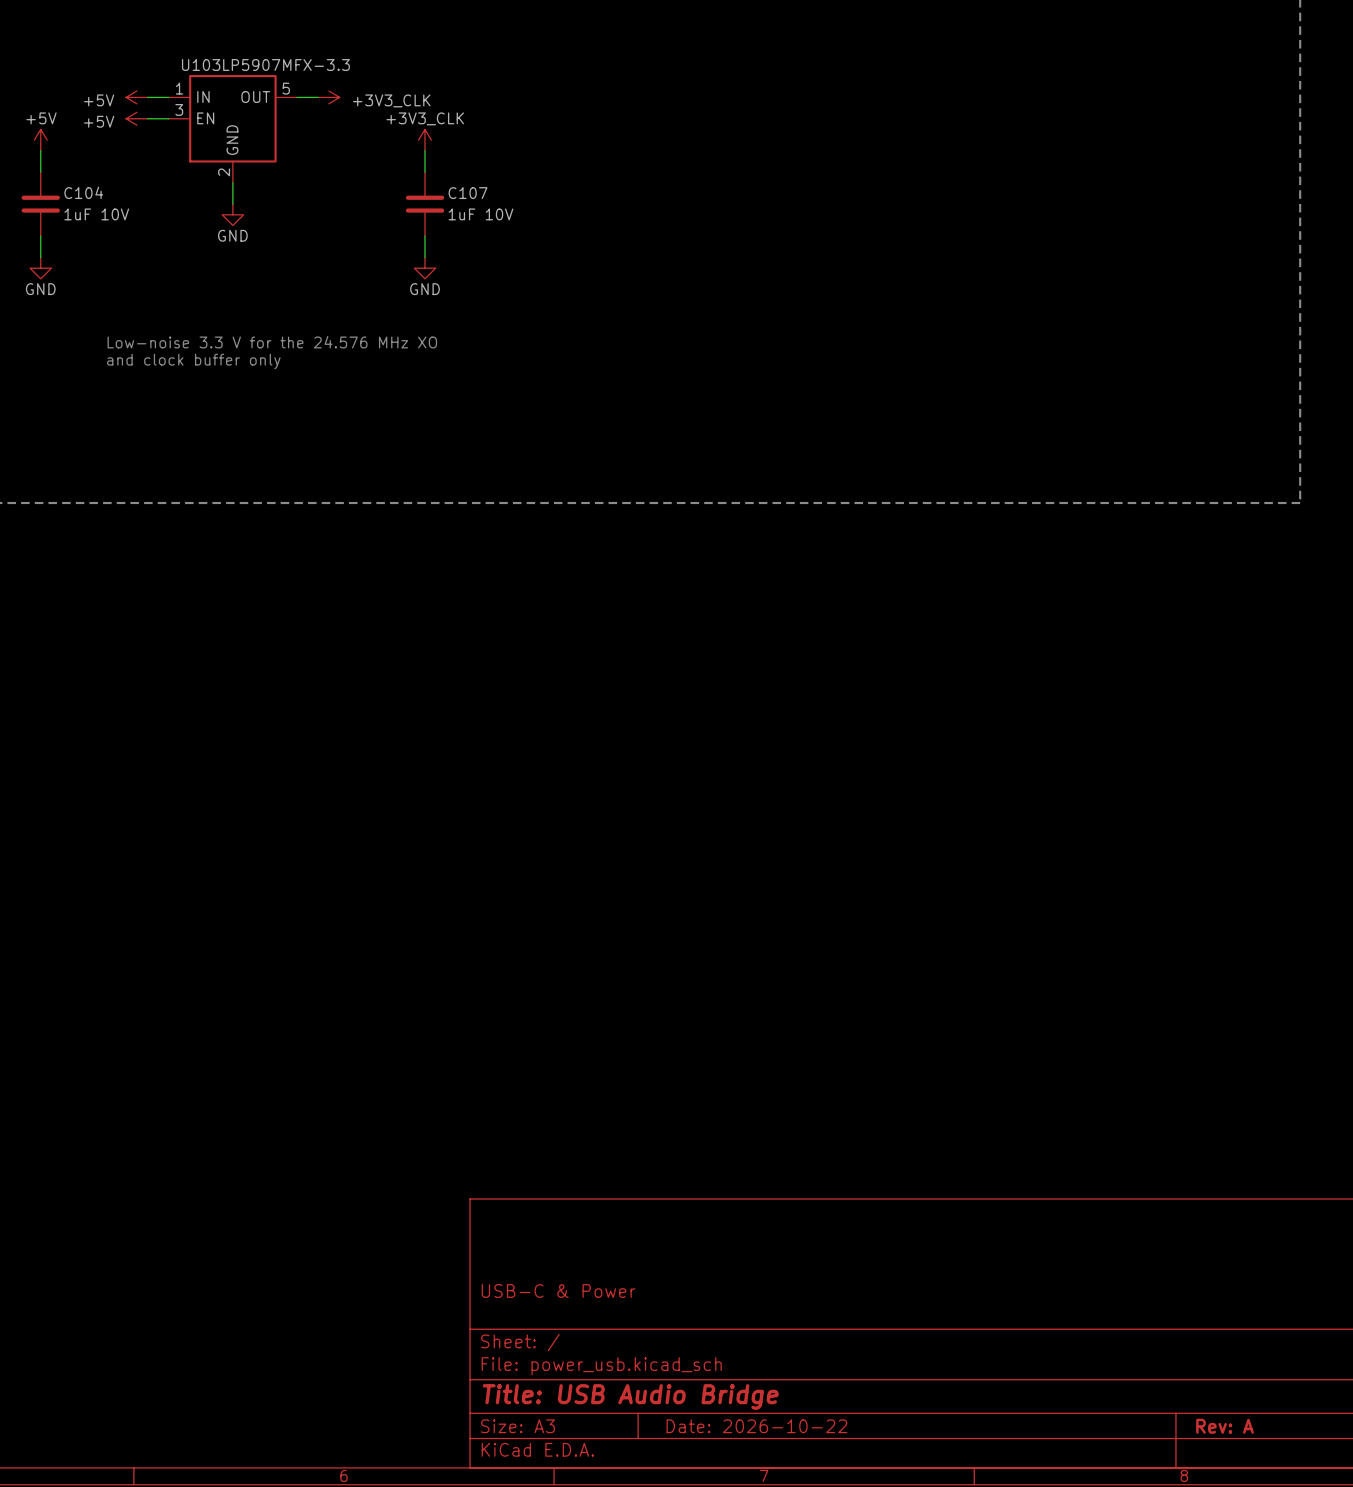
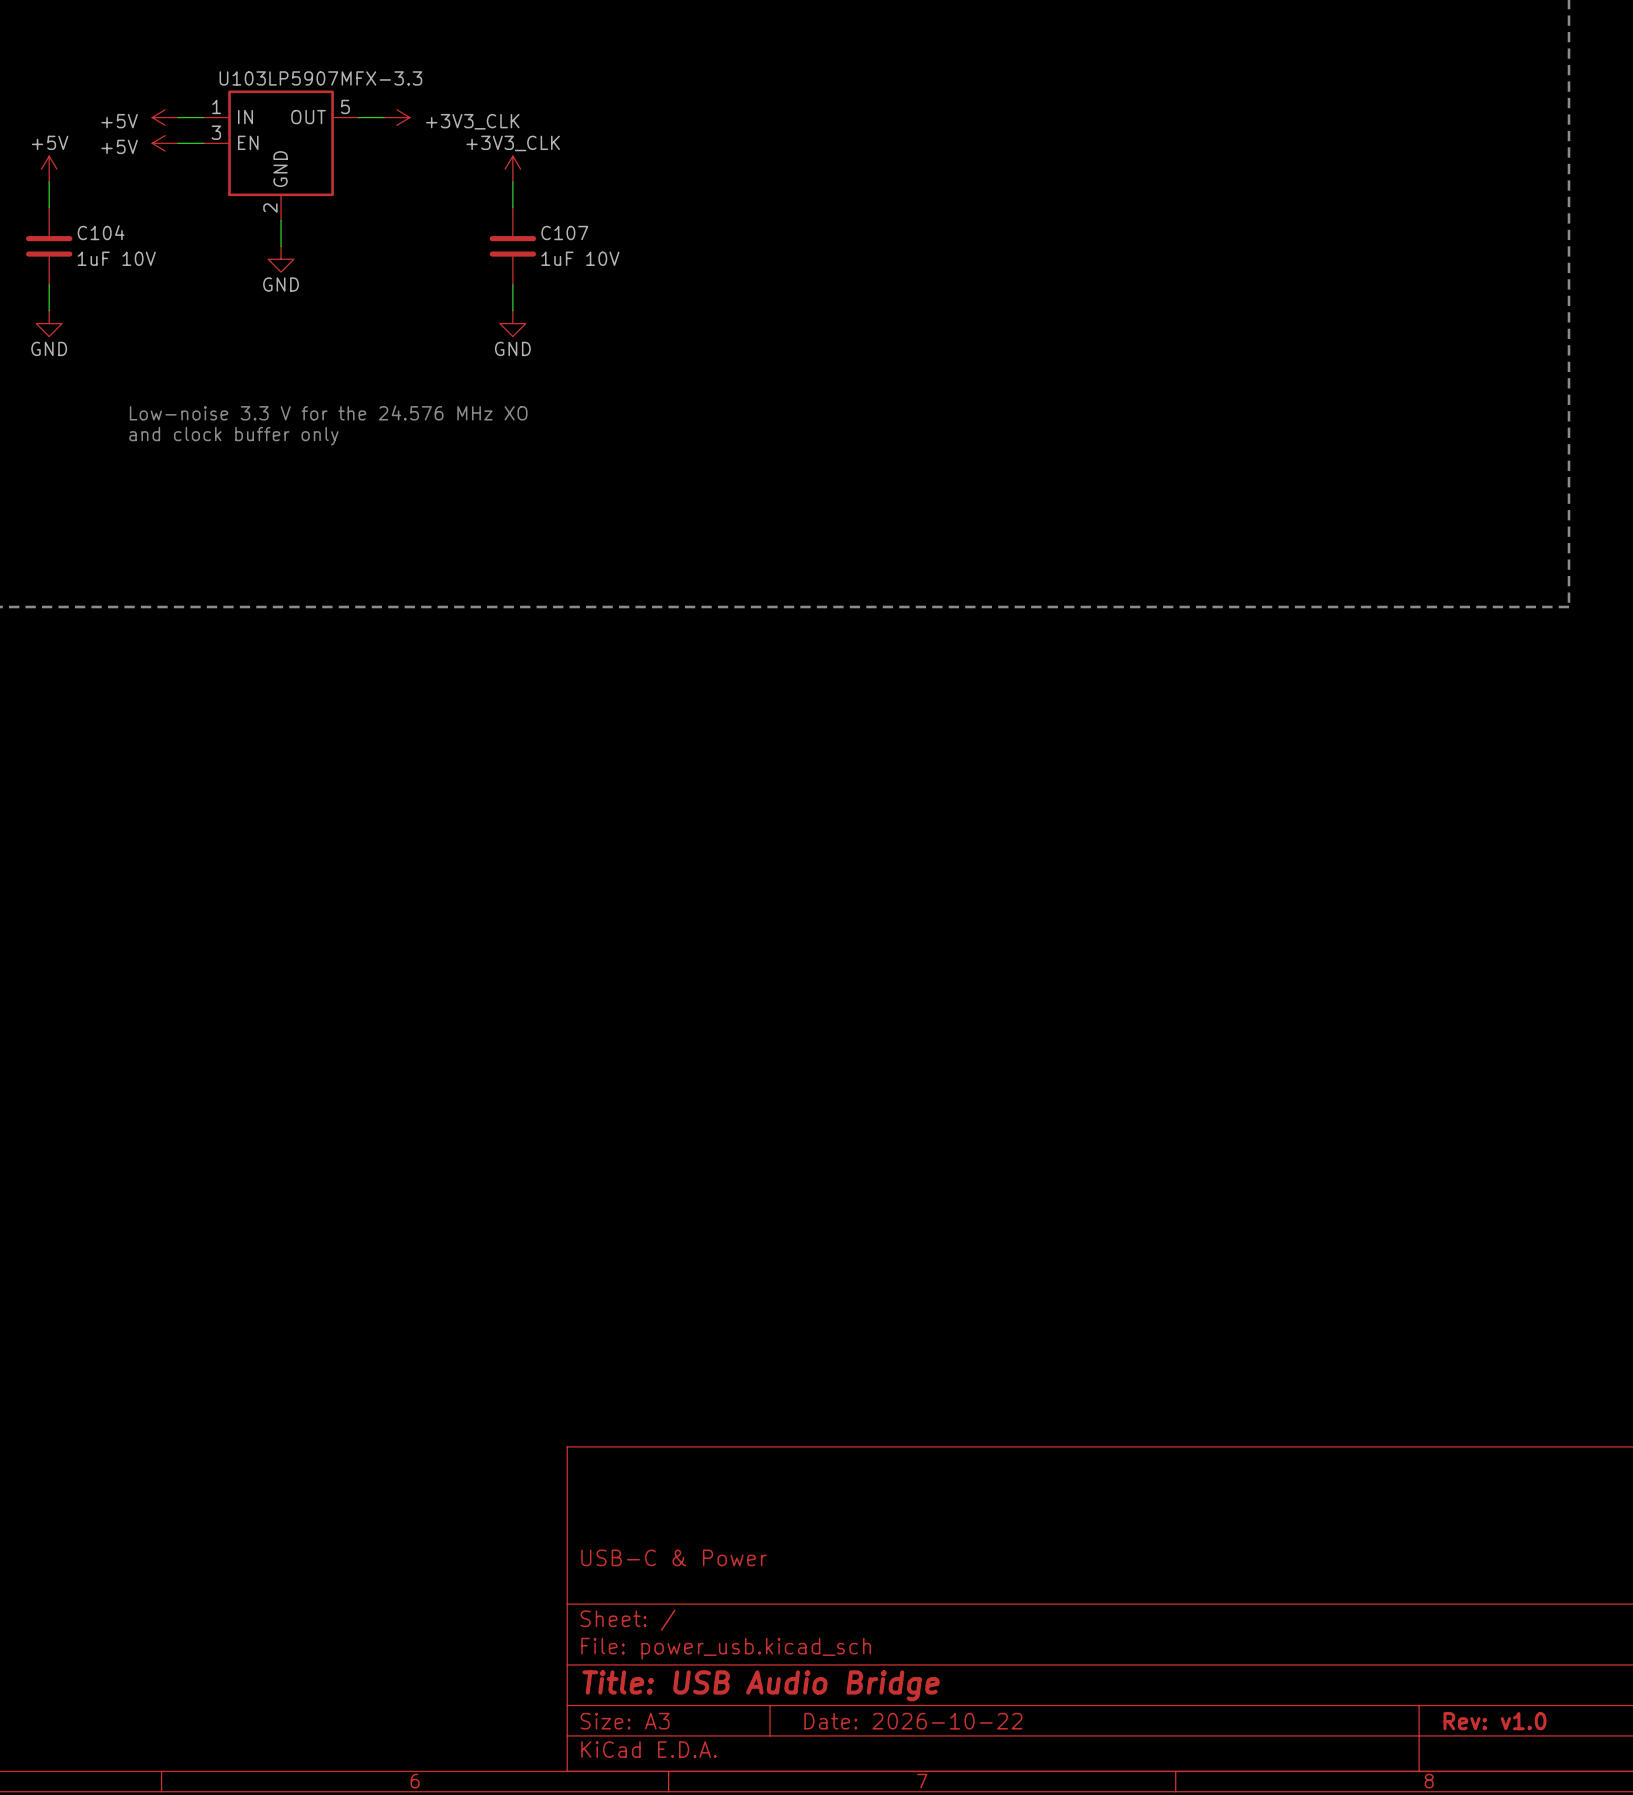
title block: Rev: A (1225, 1426) -> Rev: v1.0 (1494, 1721)

